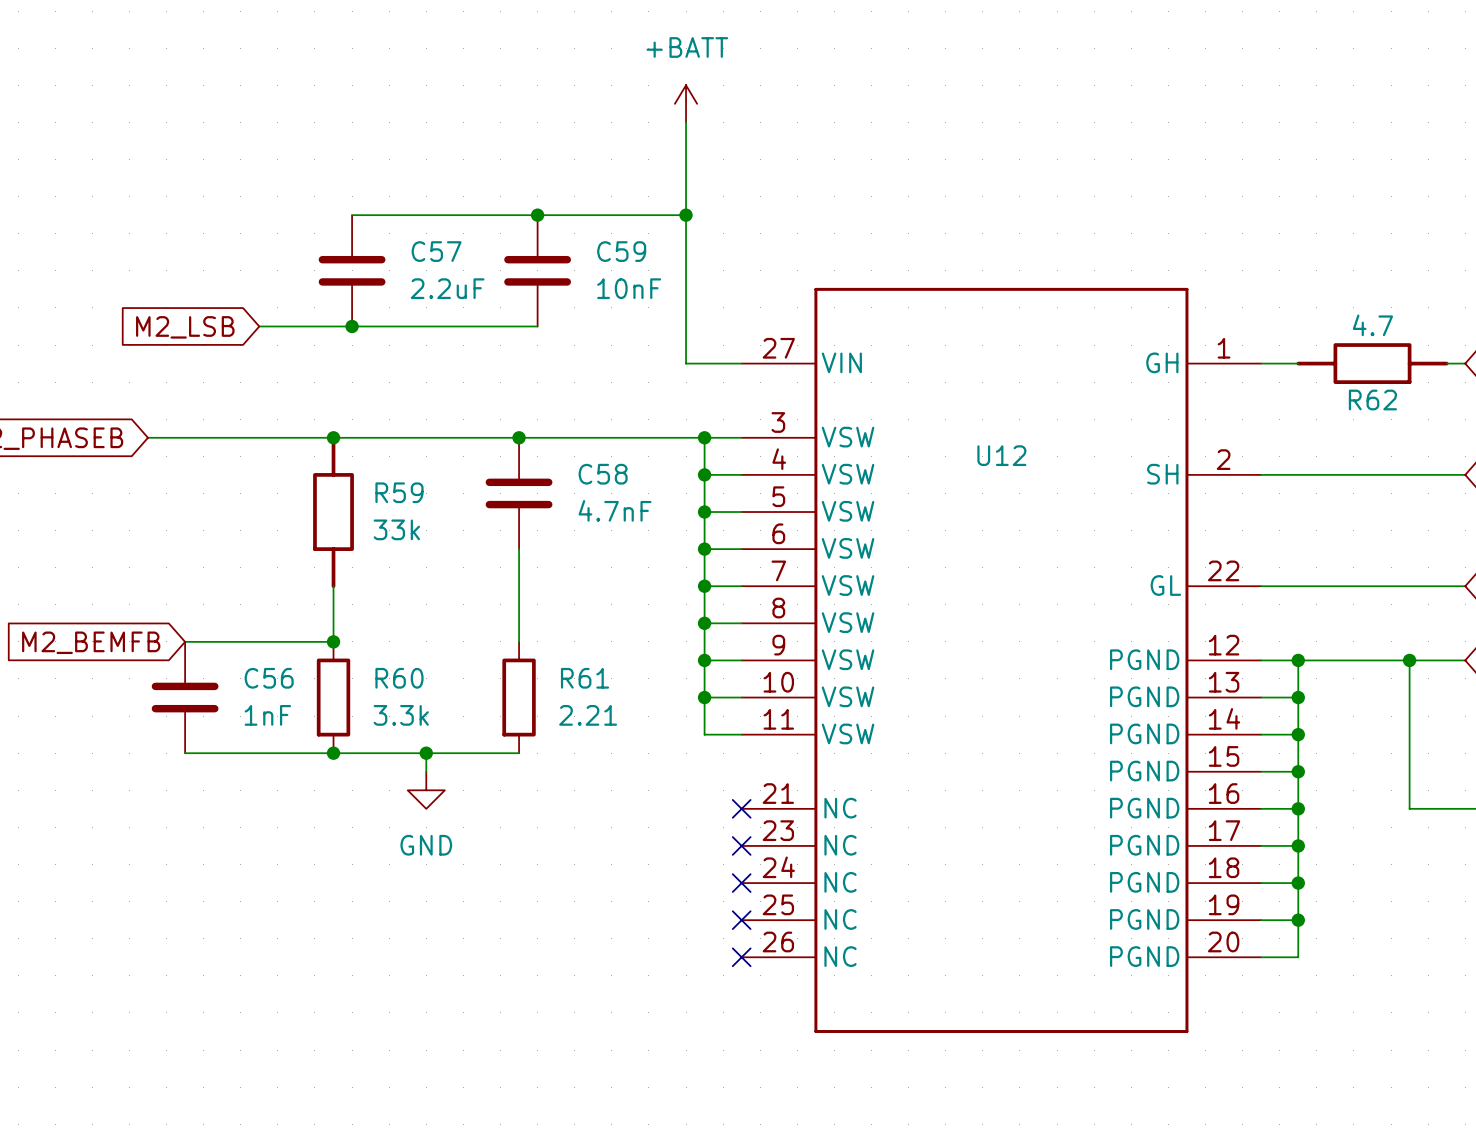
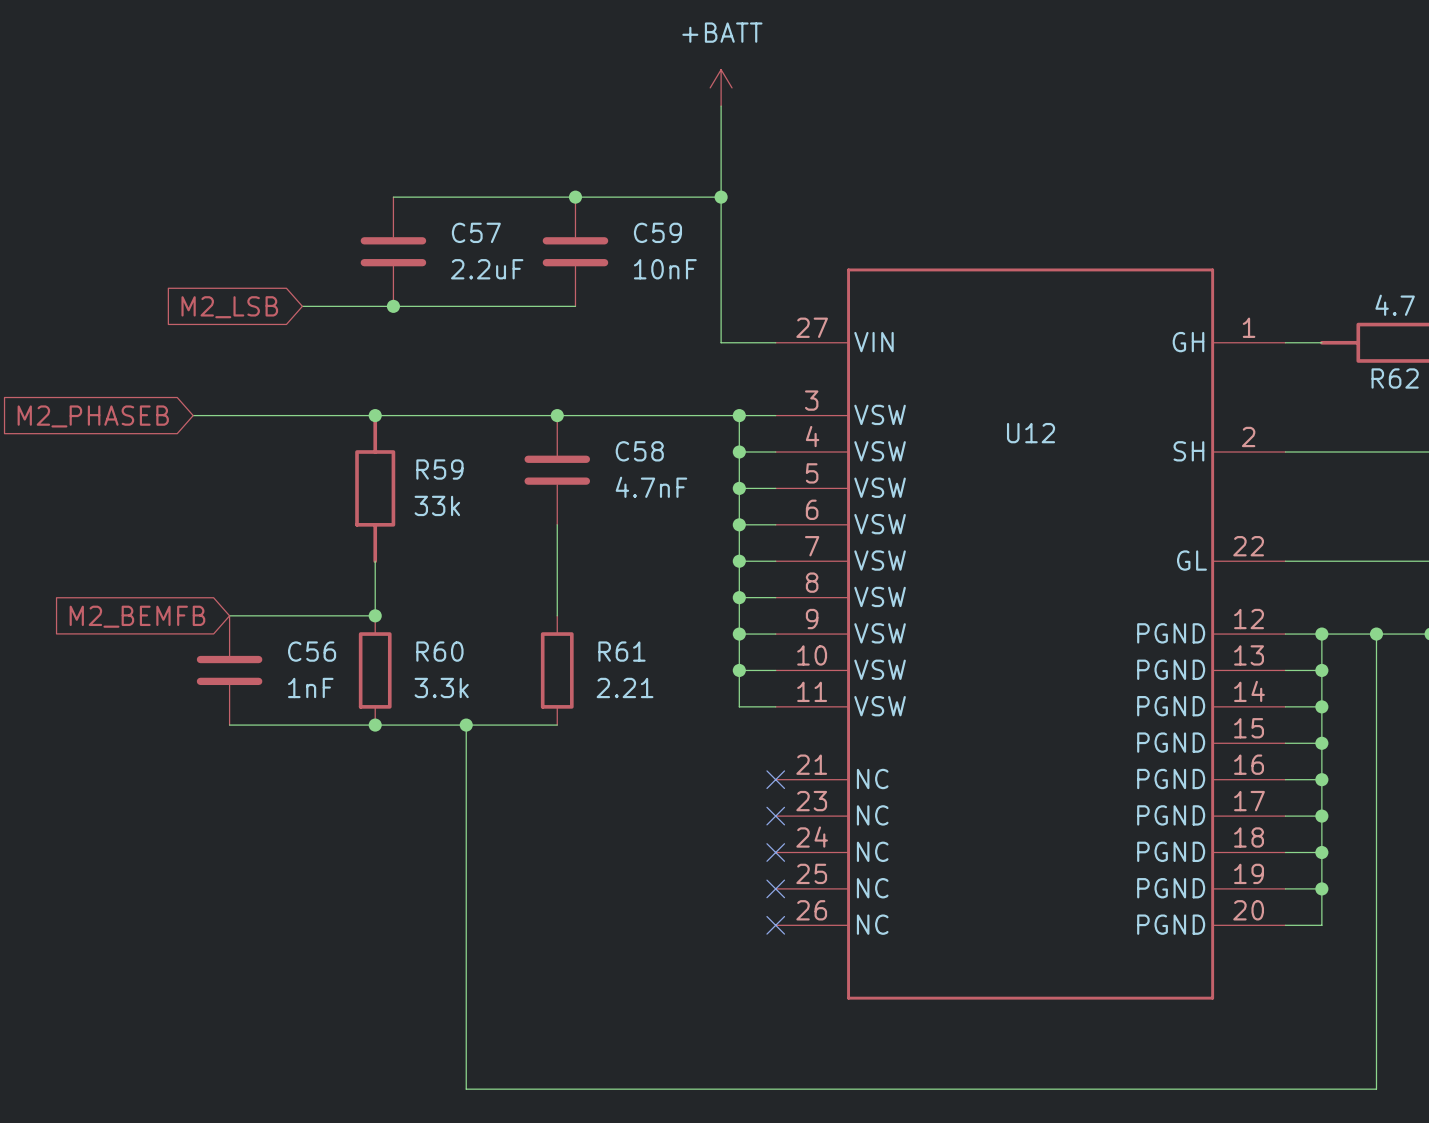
wire: none -> (1376, 634) (1376, 1089) (466, 1089) (466, 743)
junction: none -> (1376, 634)
power symbol: GND (426, 790) -> none

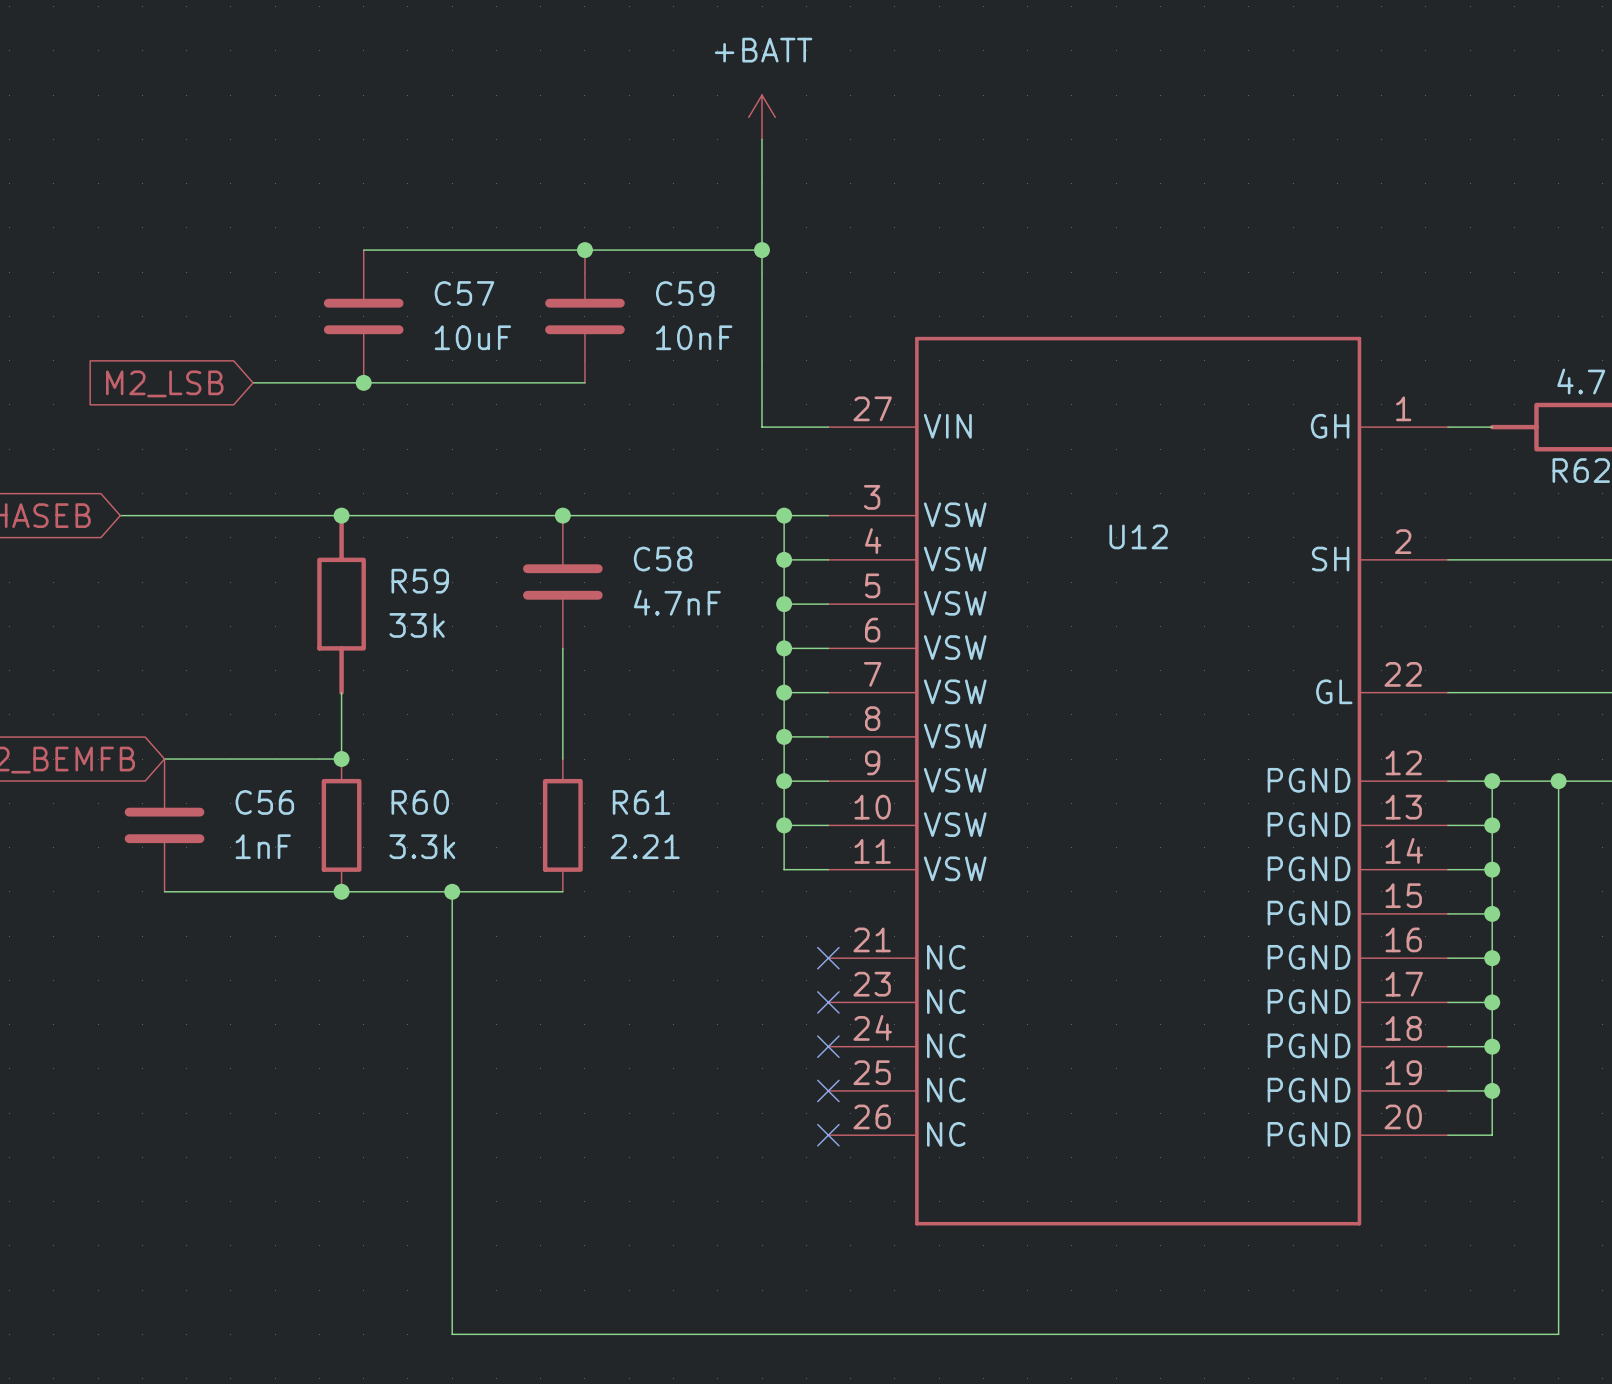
C57 value: 2.2uF (487, 269) -> 10uF (472, 337)

